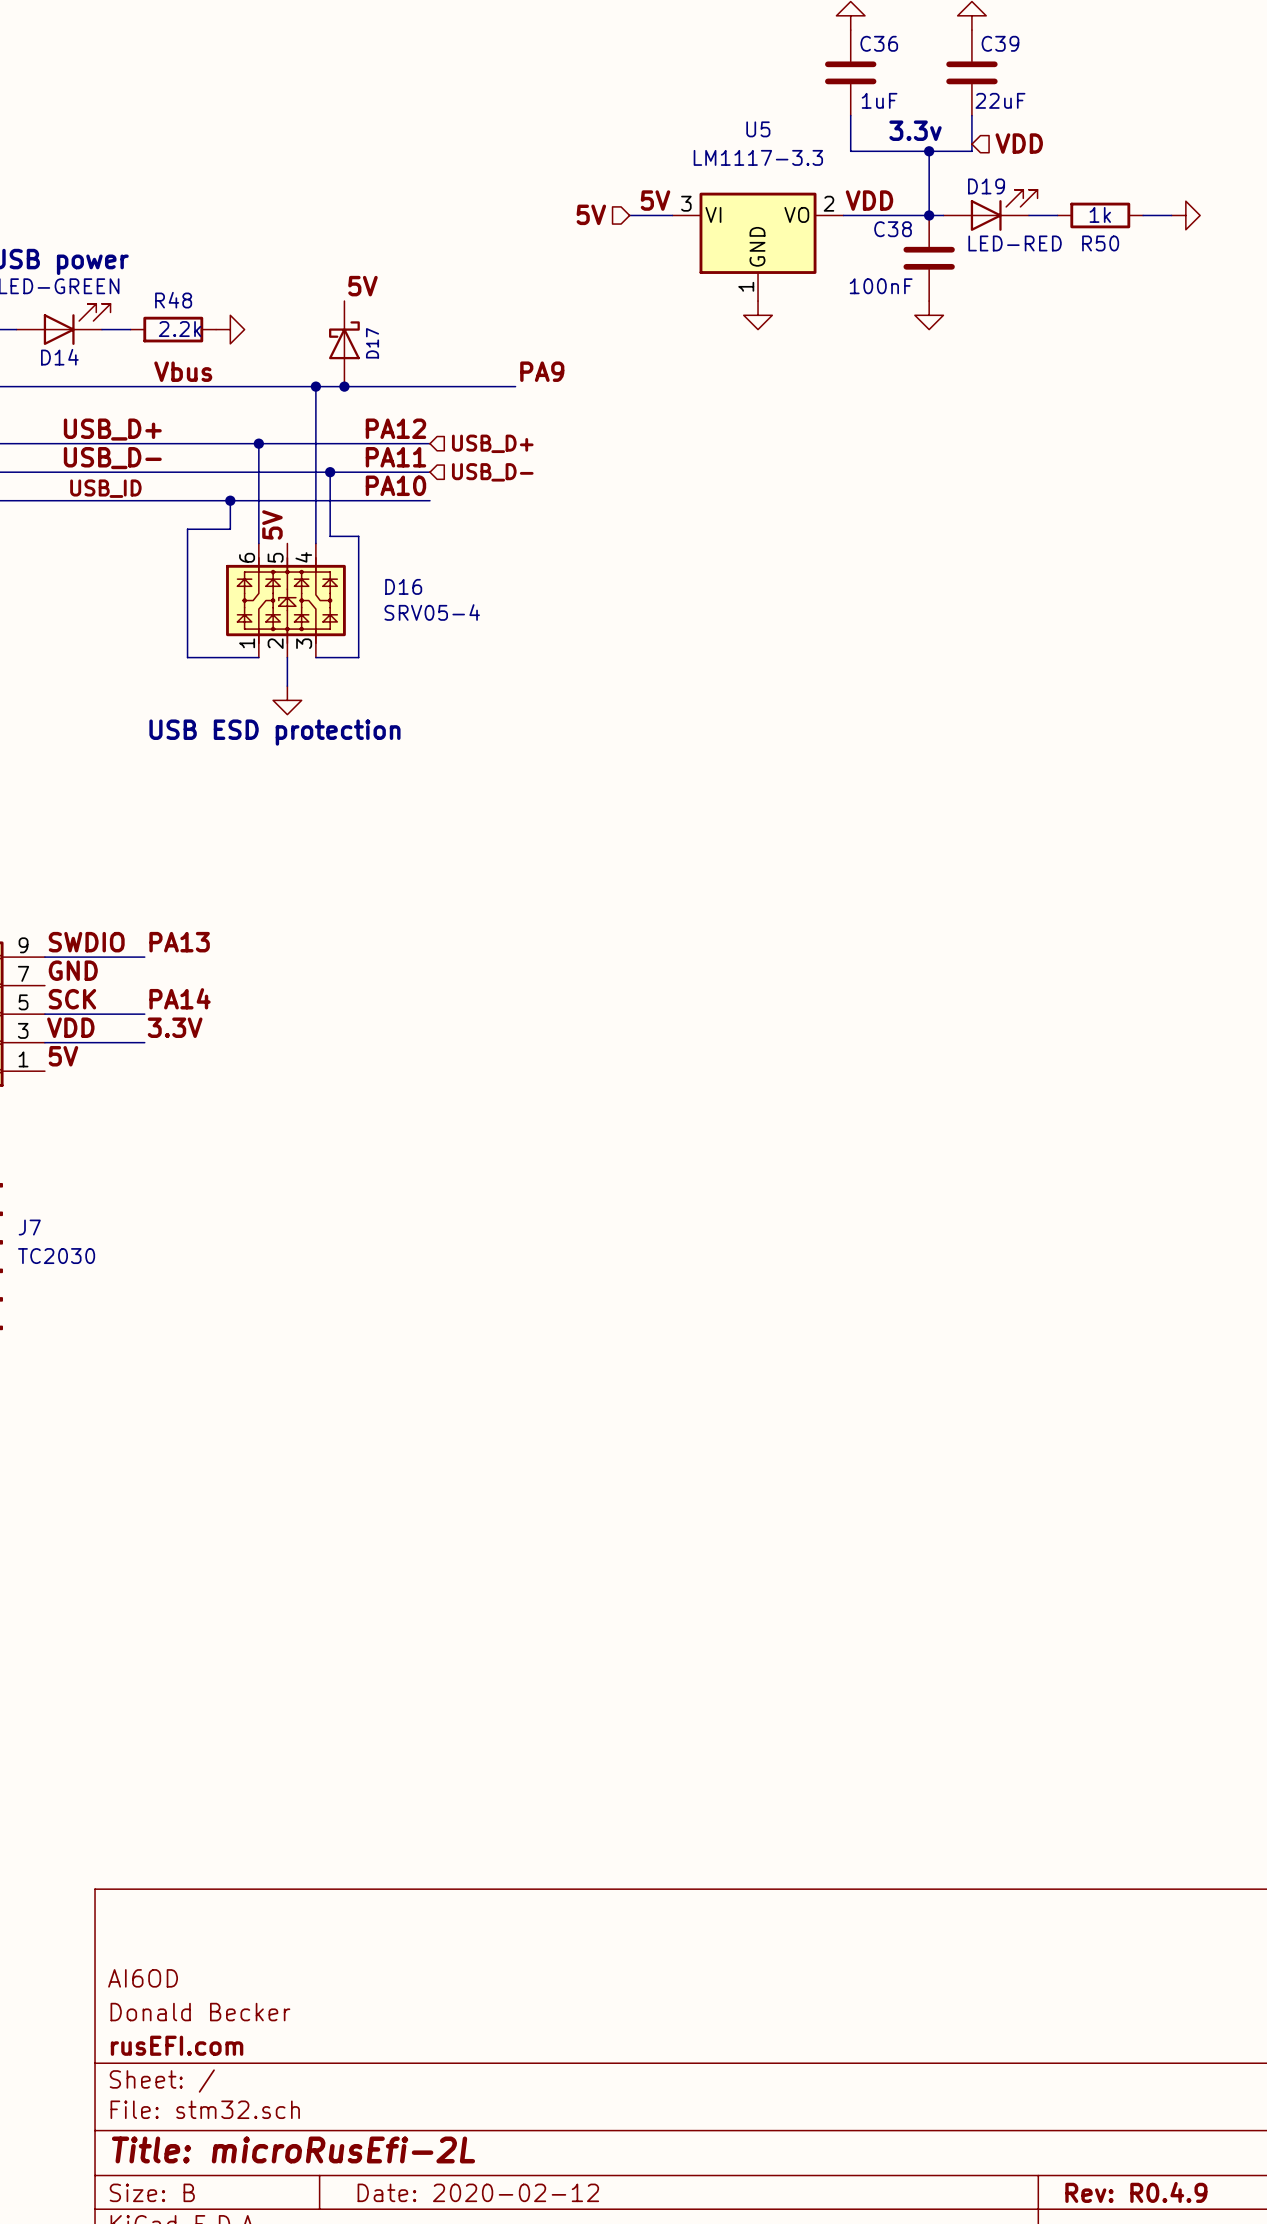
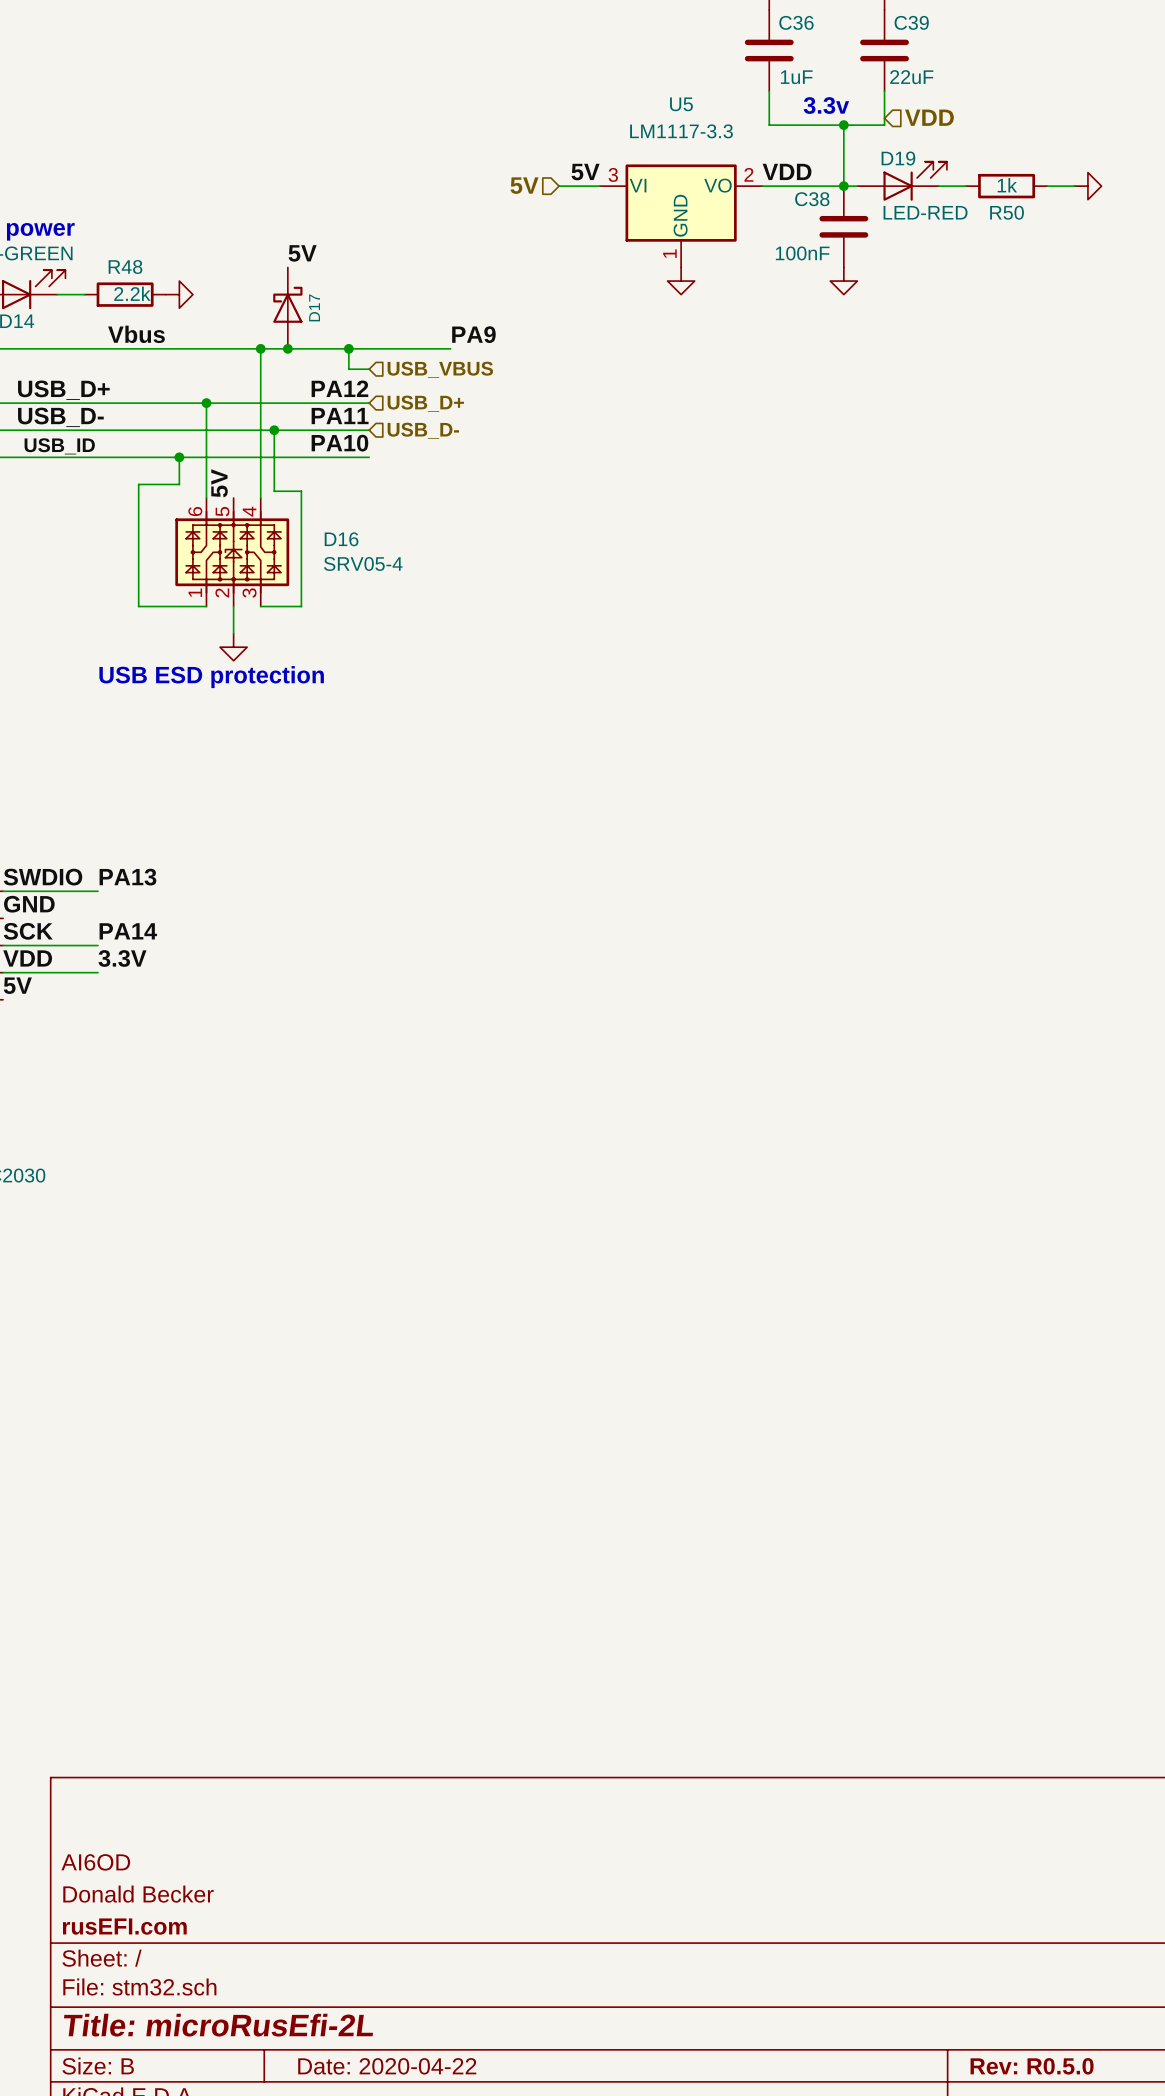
wire: none -> (348, 348) (348, 369) (369, 369)
junction: none -> (348, 348)
hierarchical label: none -> USB_VBUS (440, 369)
title block: Date: 2020-02-12 (478, 2192) -> Date: 2020-04-22 (387, 2066)
title block: Rev: R0.4.9 (1136, 2192) -> Rev: R0.5.0 (1032, 2066)

